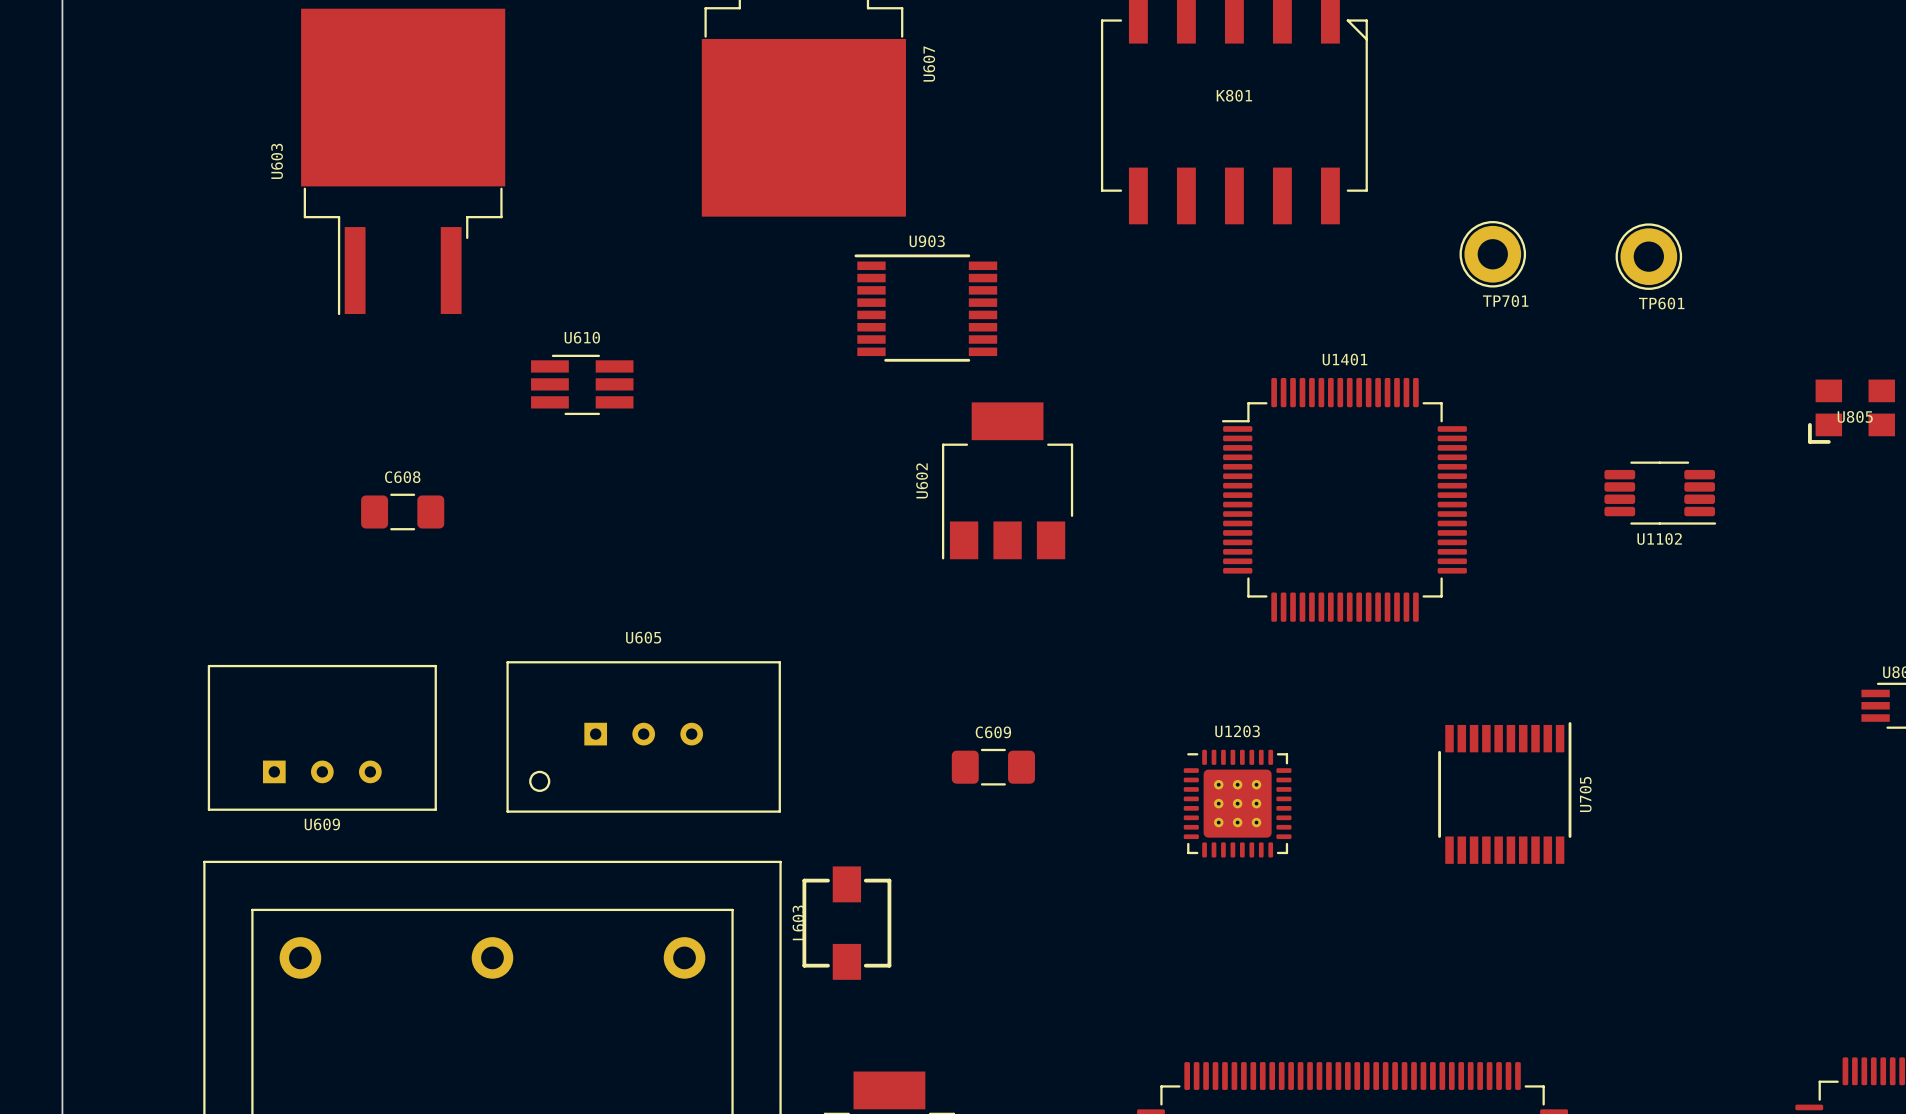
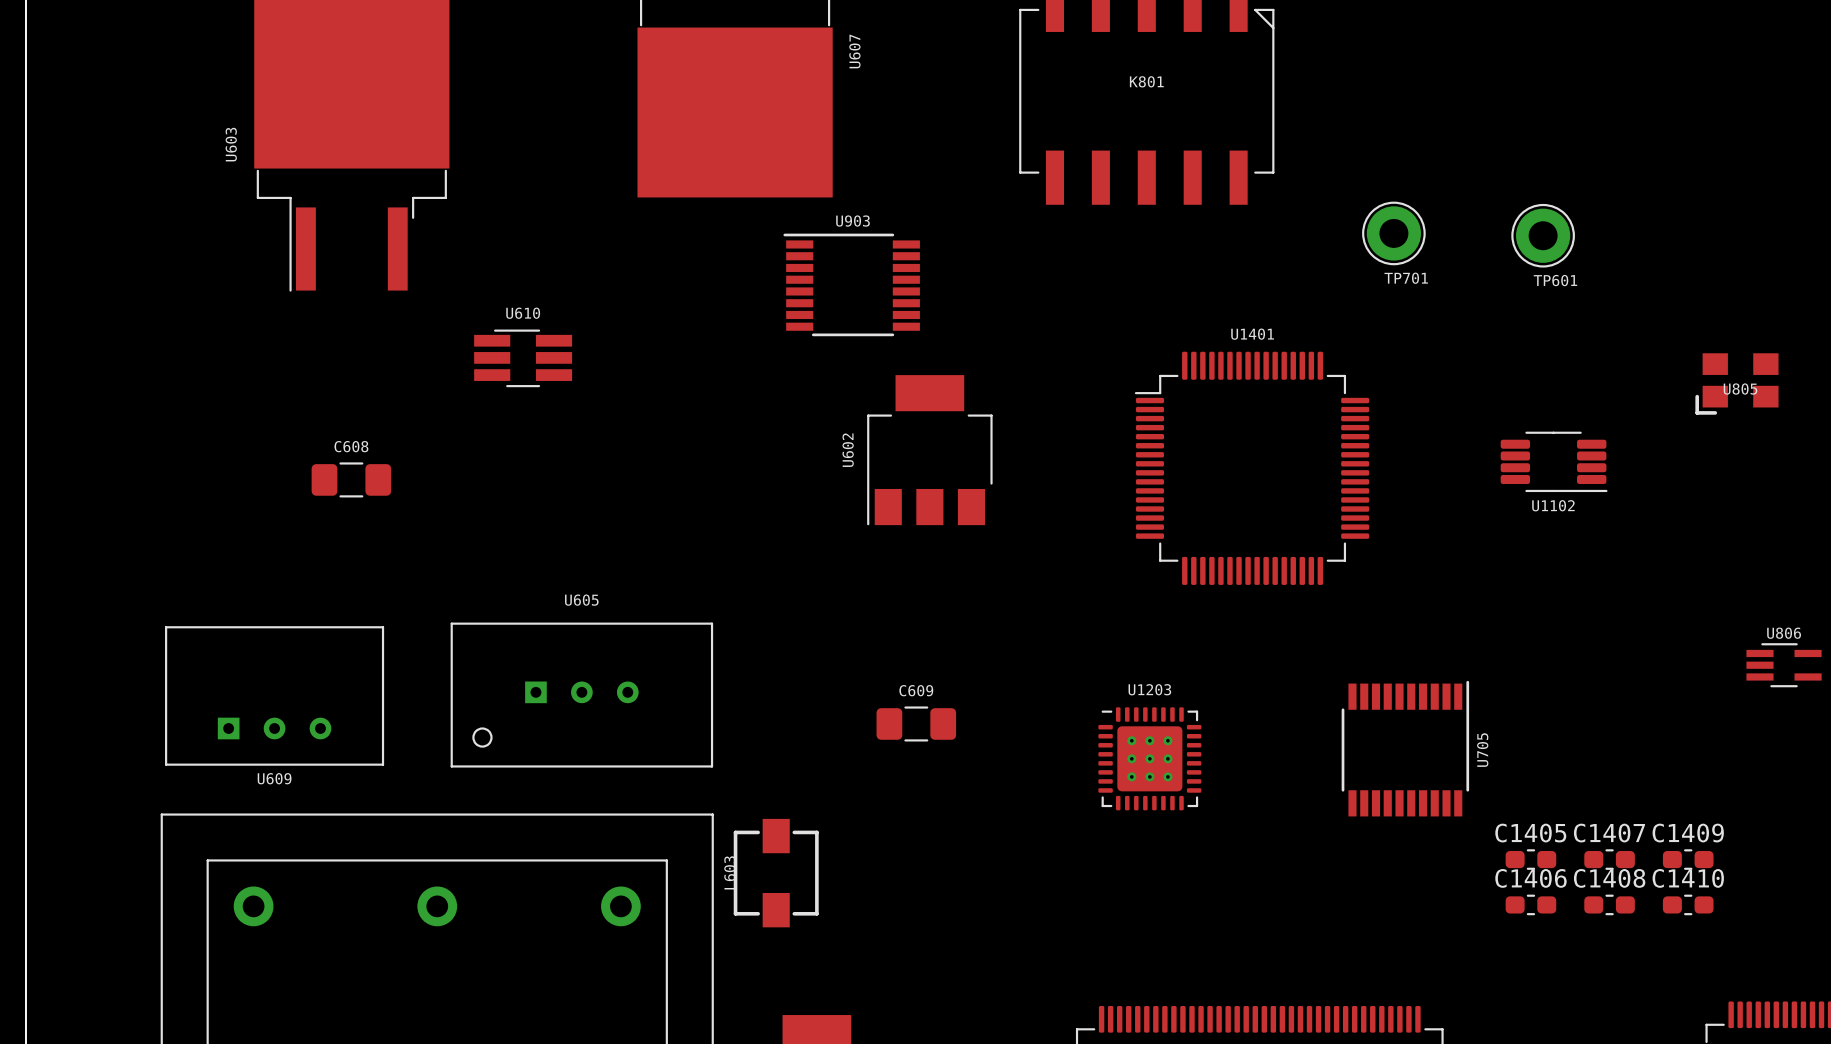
C1405: none -> (1530, 859)
C1407: none -> (1609, 859)
C1409: none -> (1688, 859)
C1406: none -> (1530, 904)
C1408: none -> (1609, 904)
C1410: none -> (1688, 904)

